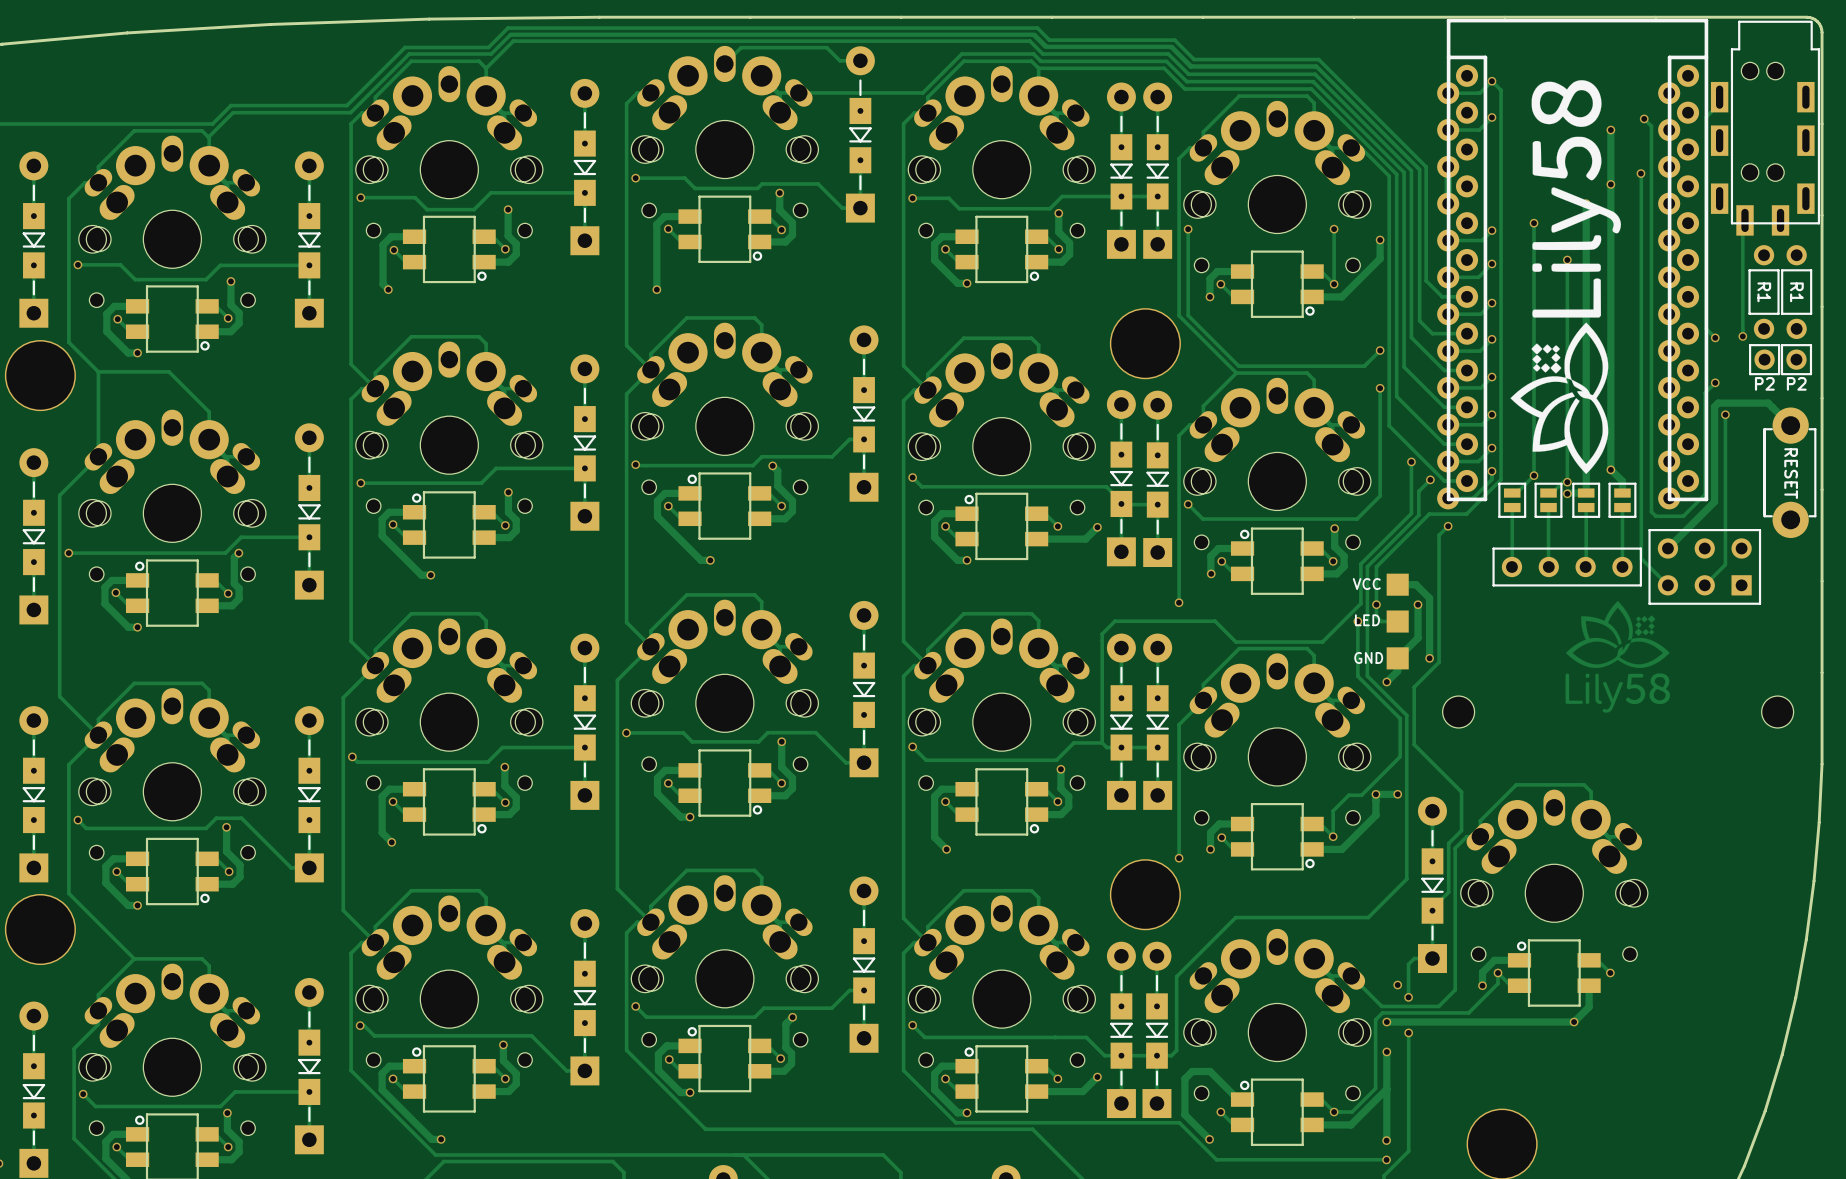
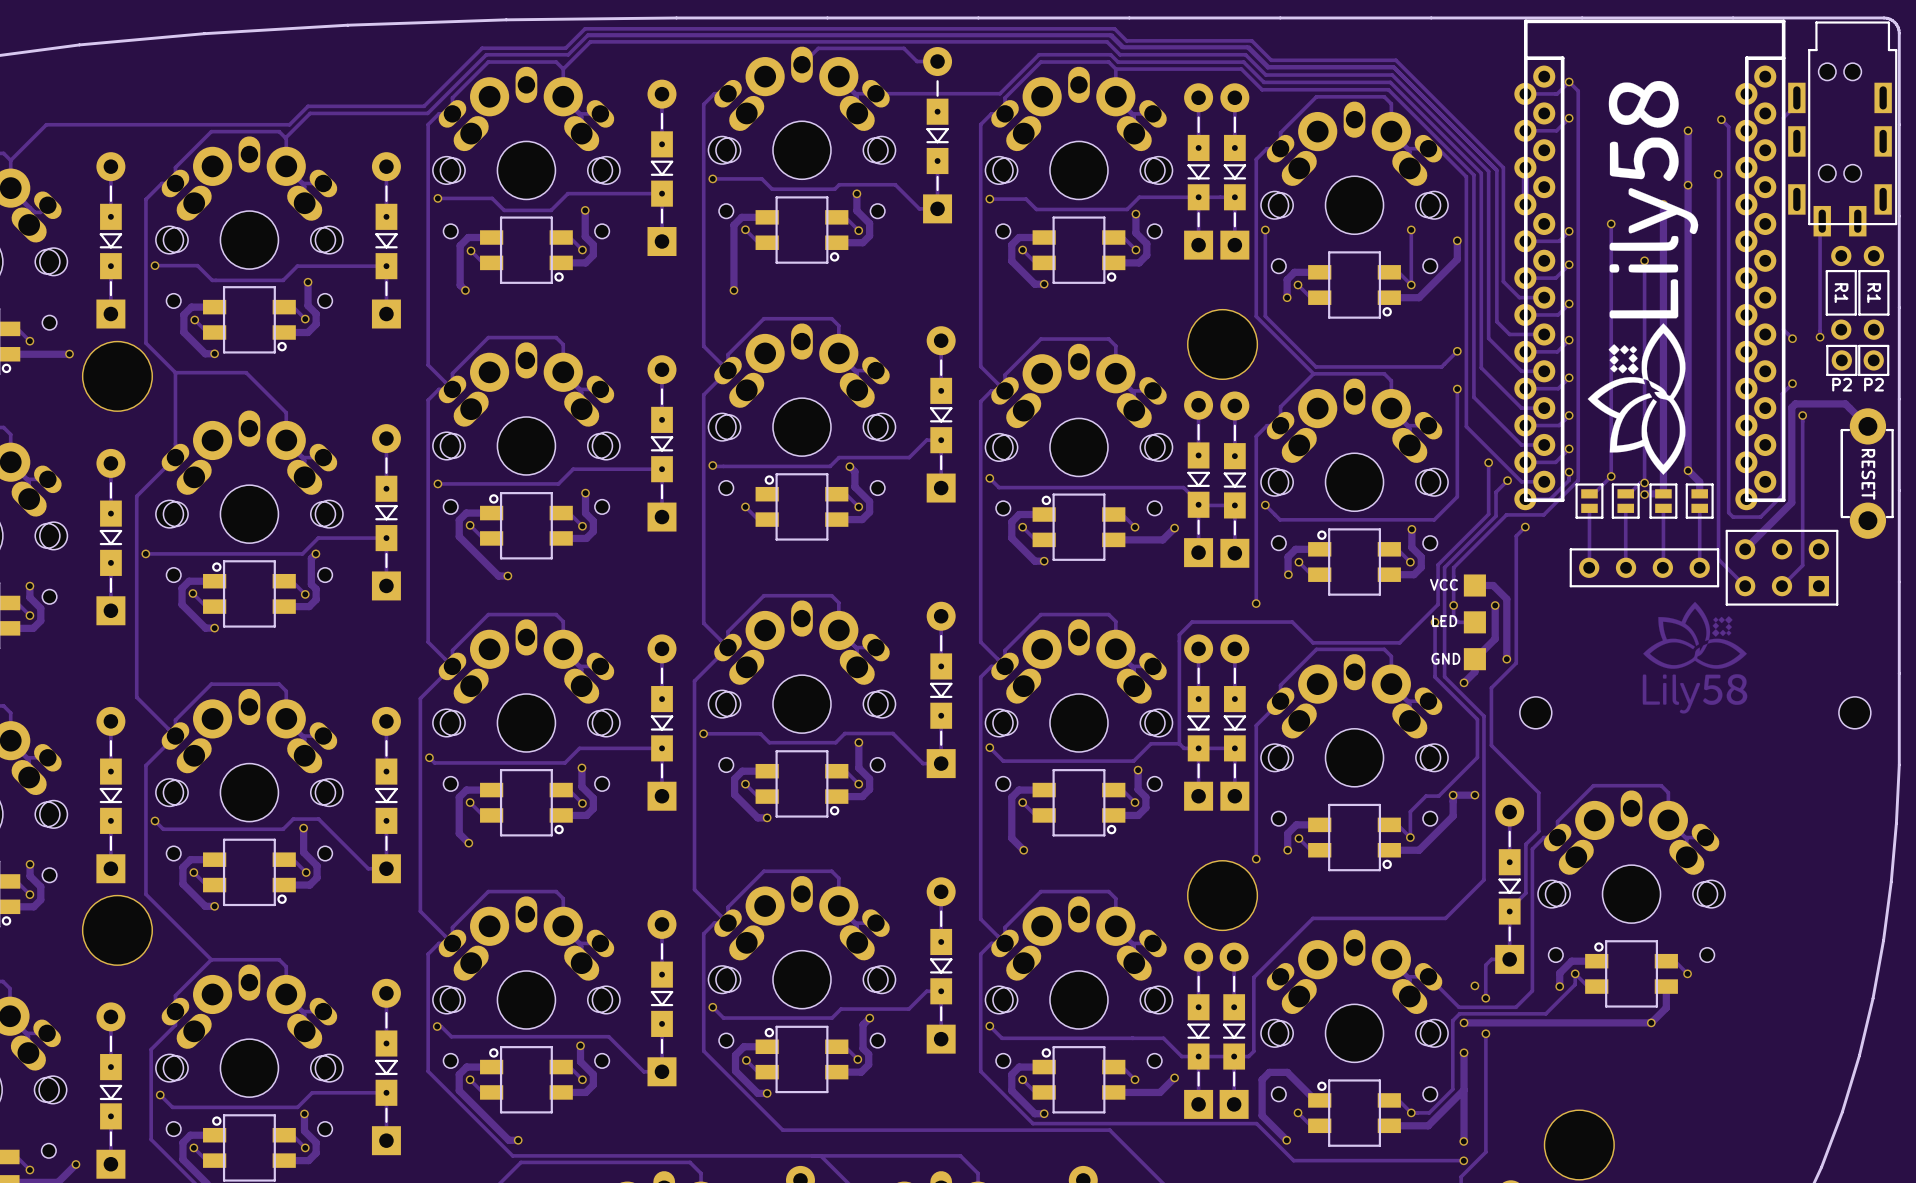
track: (690, 493) (664, 493) (657, 500) (657, 516) (701, 560) (710, 560) -> none
via: (710, 560) -> none

